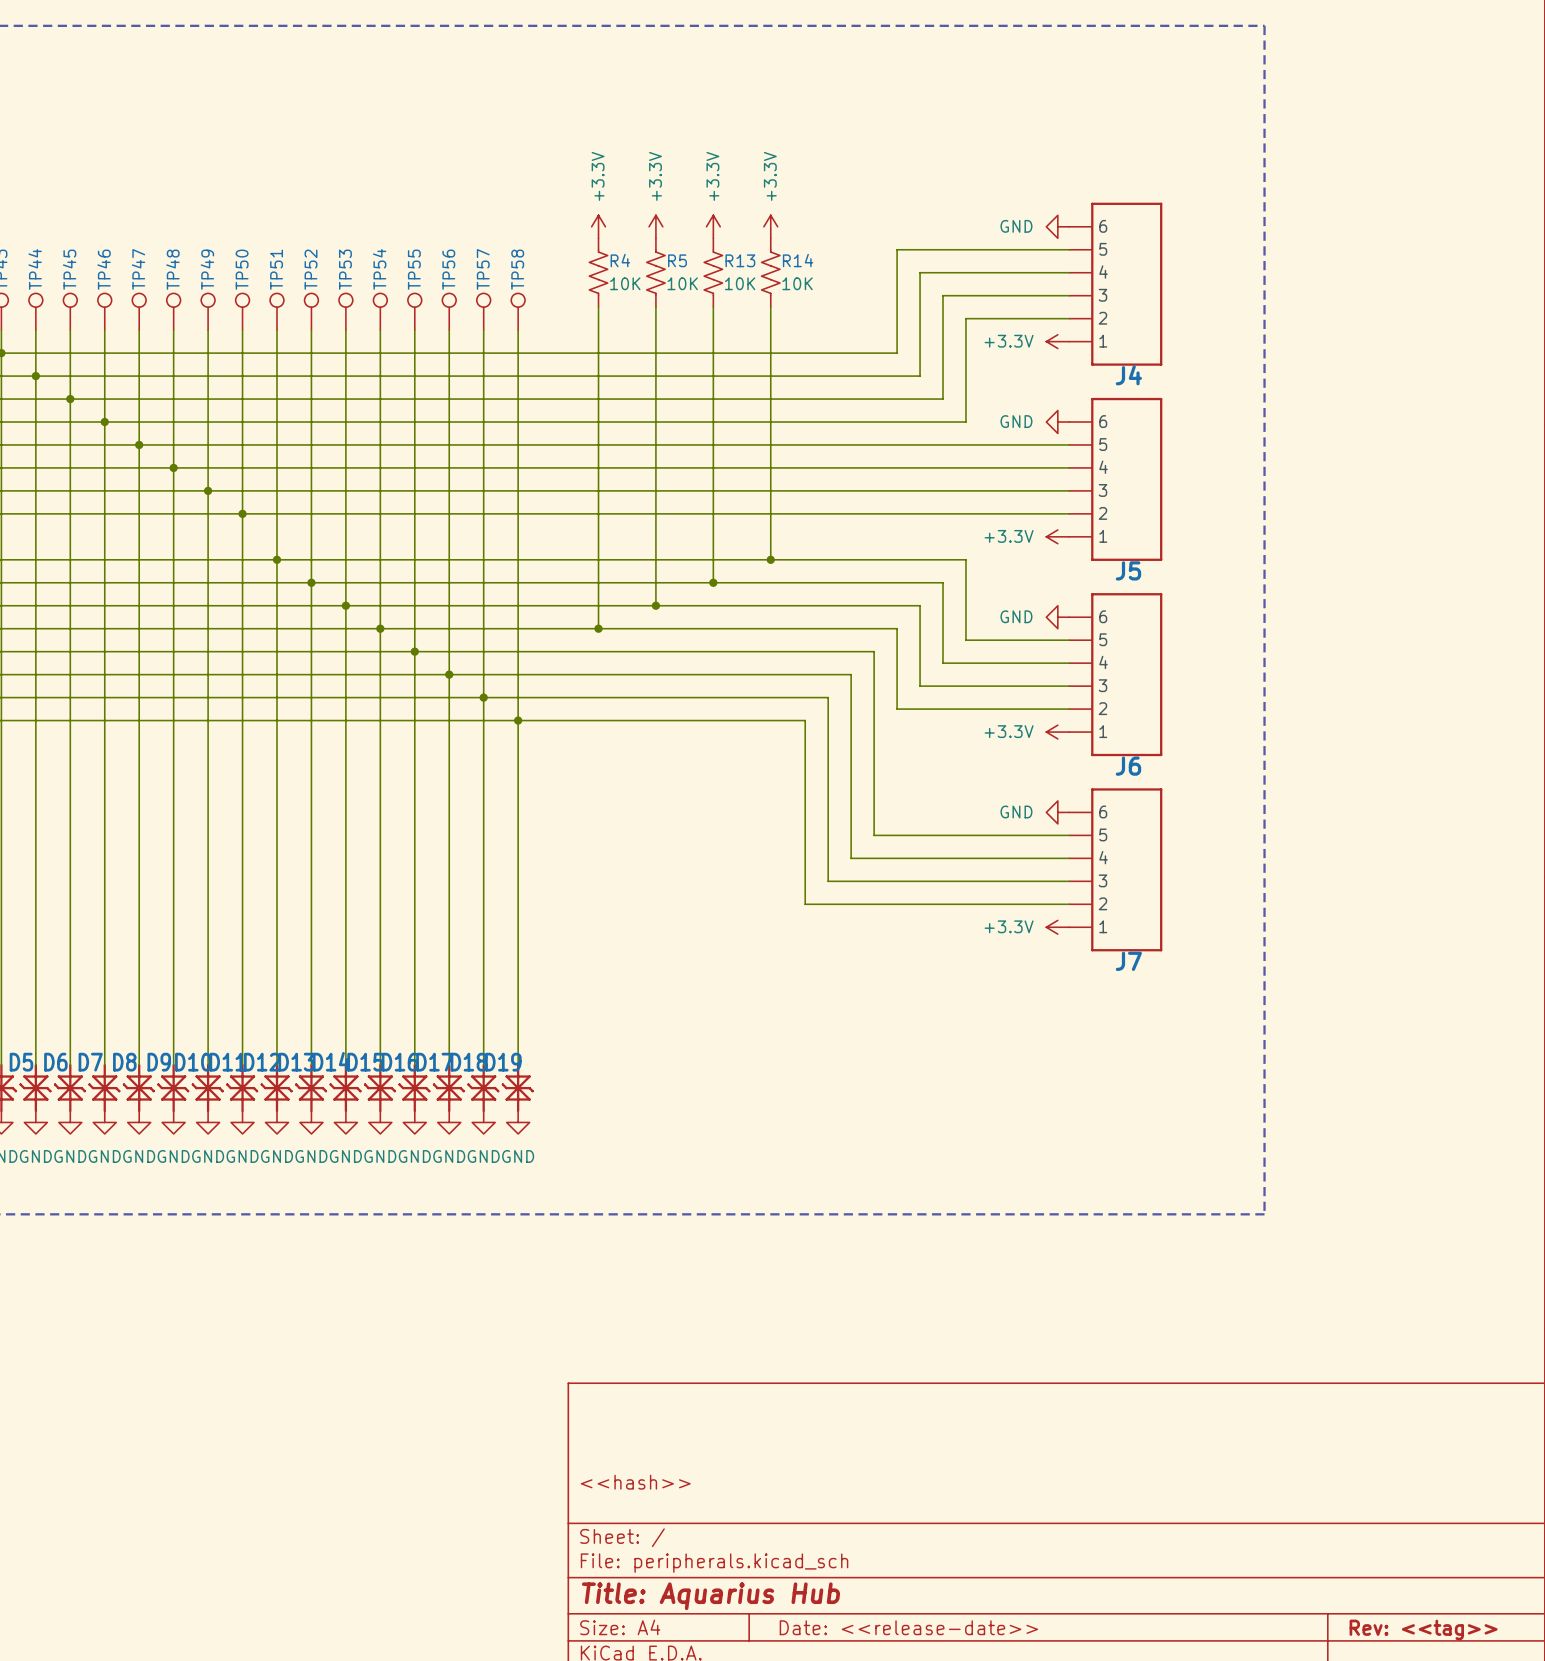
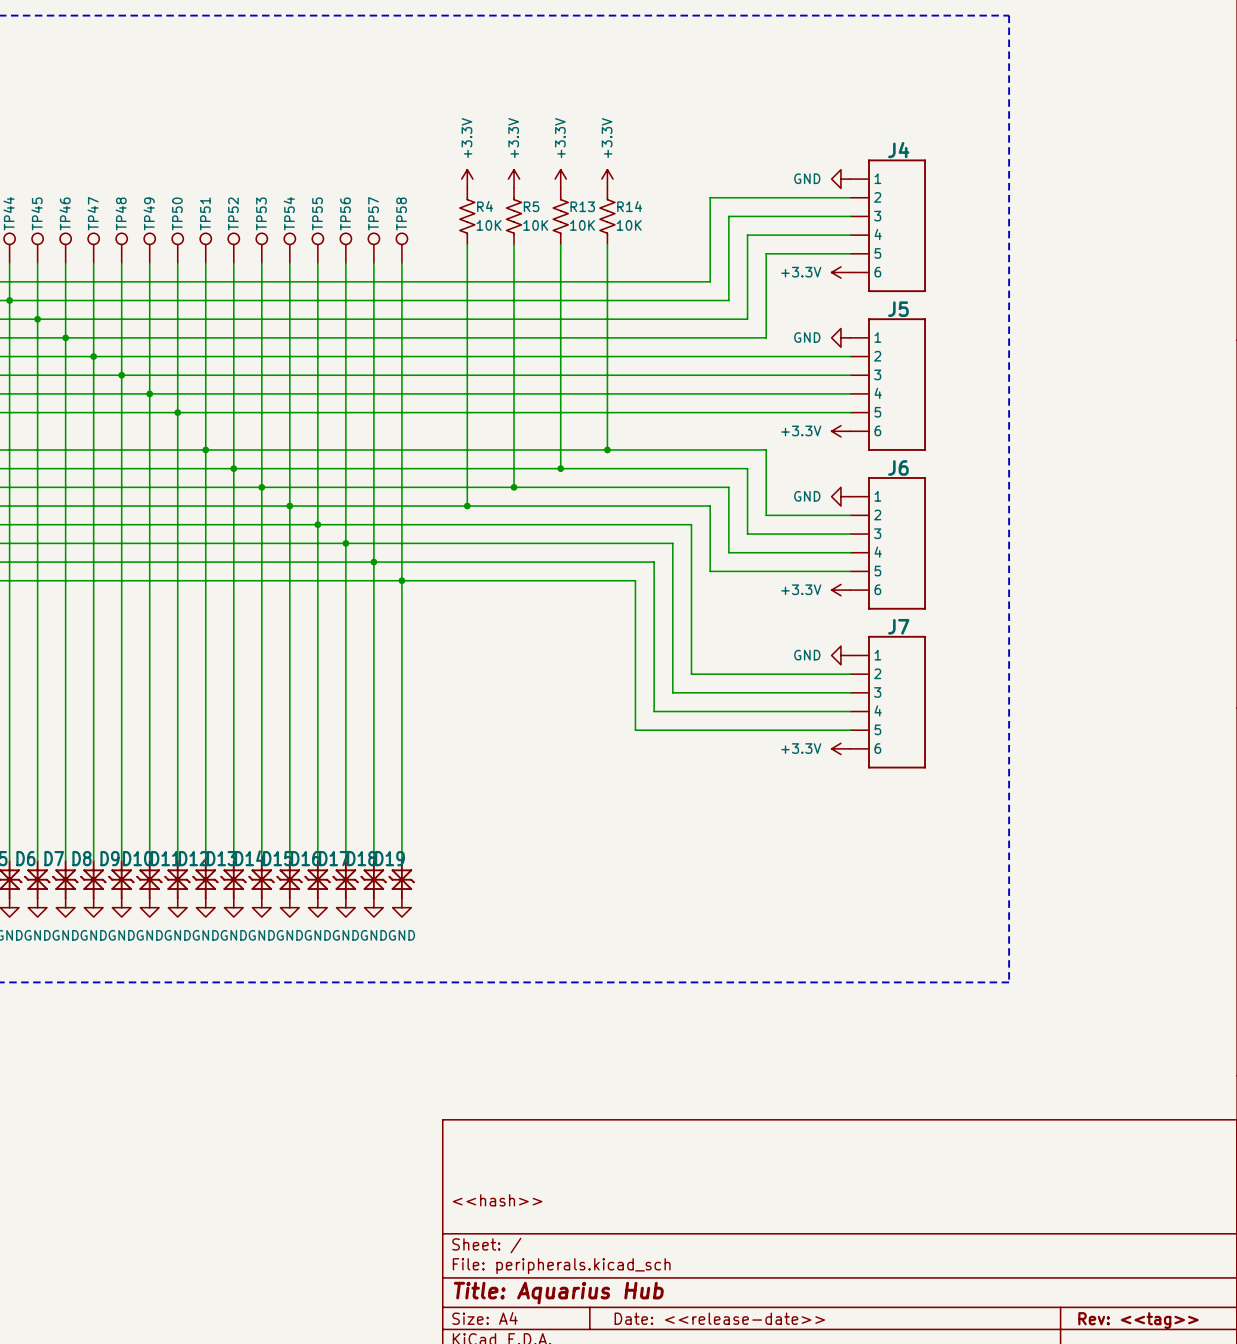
J4 flip: as is (1126, 284) -> up-down (897, 225)
J5 flip: as is (1126, 479) -> up-down (897, 384)
J6 flip: as is (1126, 674) -> up-down (897, 543)
J7 flip: as is (1126, 869) -> up-down (897, 702)

